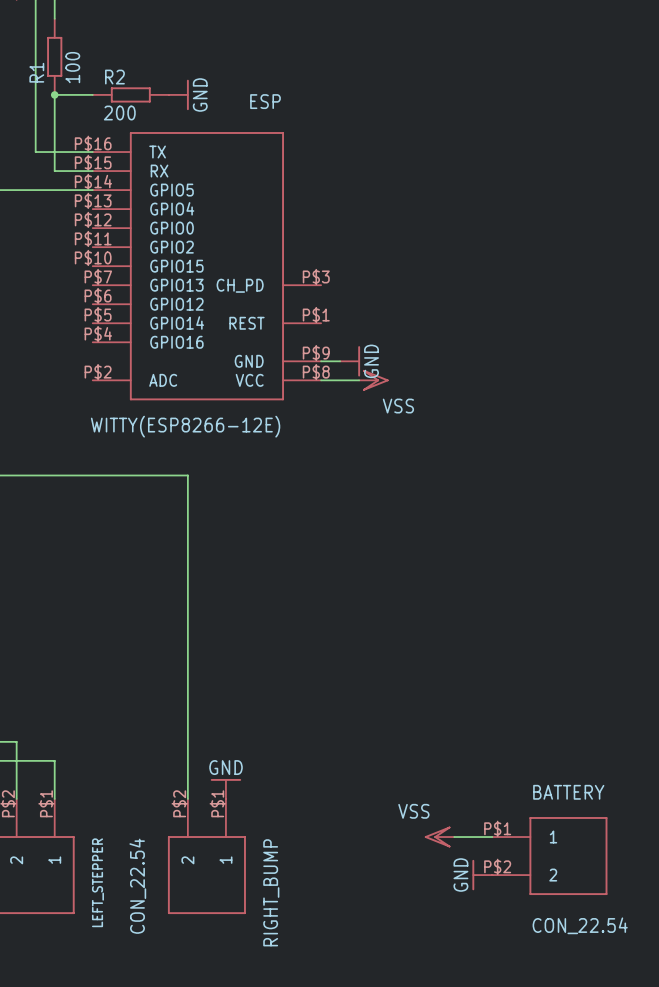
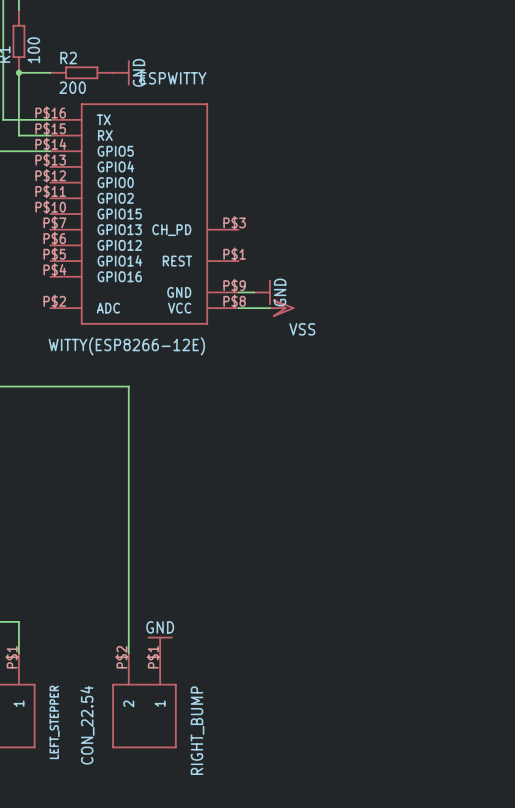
WITTY(ESP8266-12E) value: ESP (265, 101) -> ESPWITTY (173, 78)
power symbol: VSS (439, 837) -> none
wire: (454, 837) (492, 837) -> none
BATTERY: CON_22.54 (549, 856) -> none
power symbol: GND (482, 875) -> none

